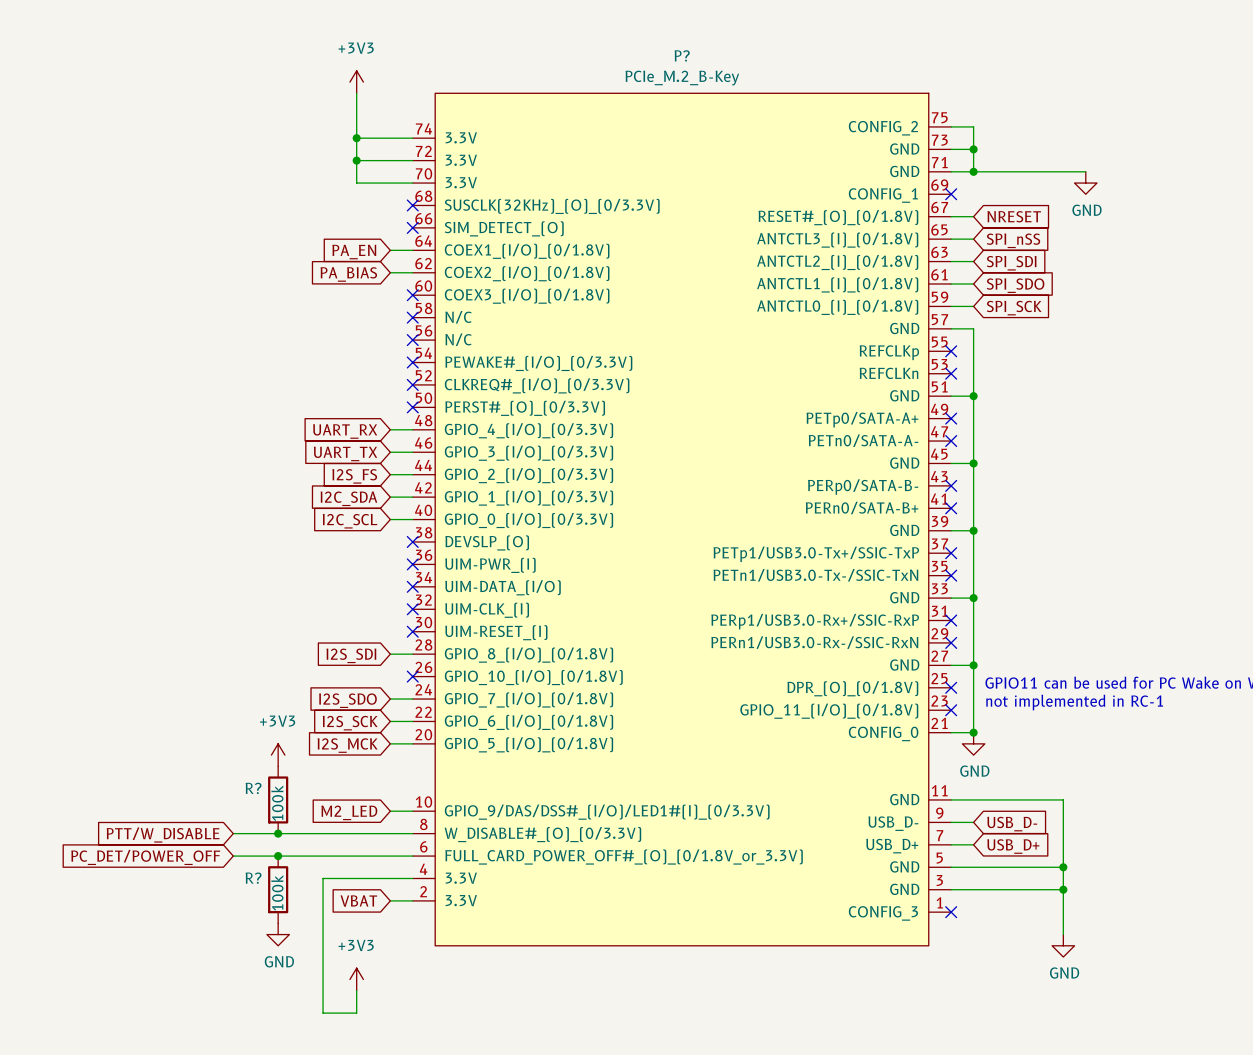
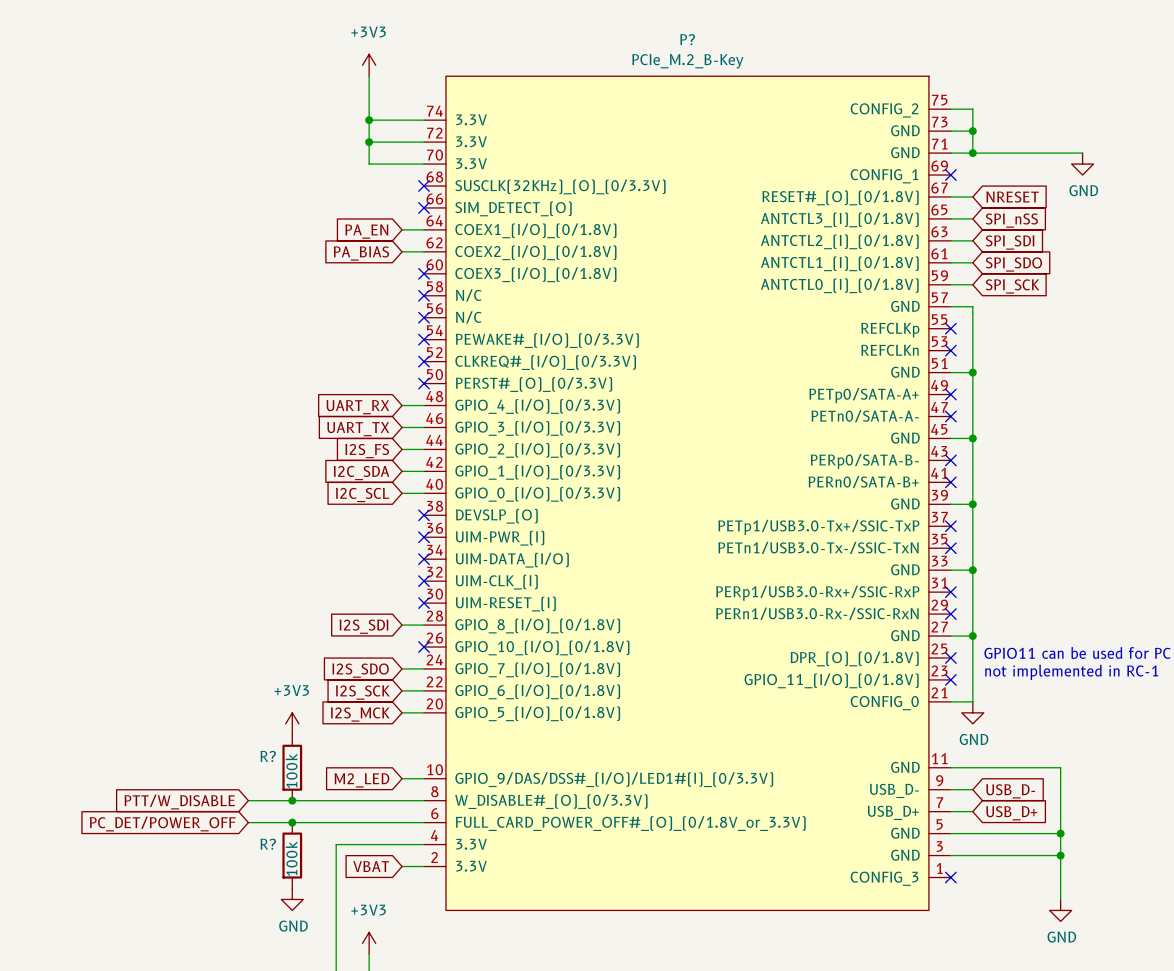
junction: (973, 732) -> none

